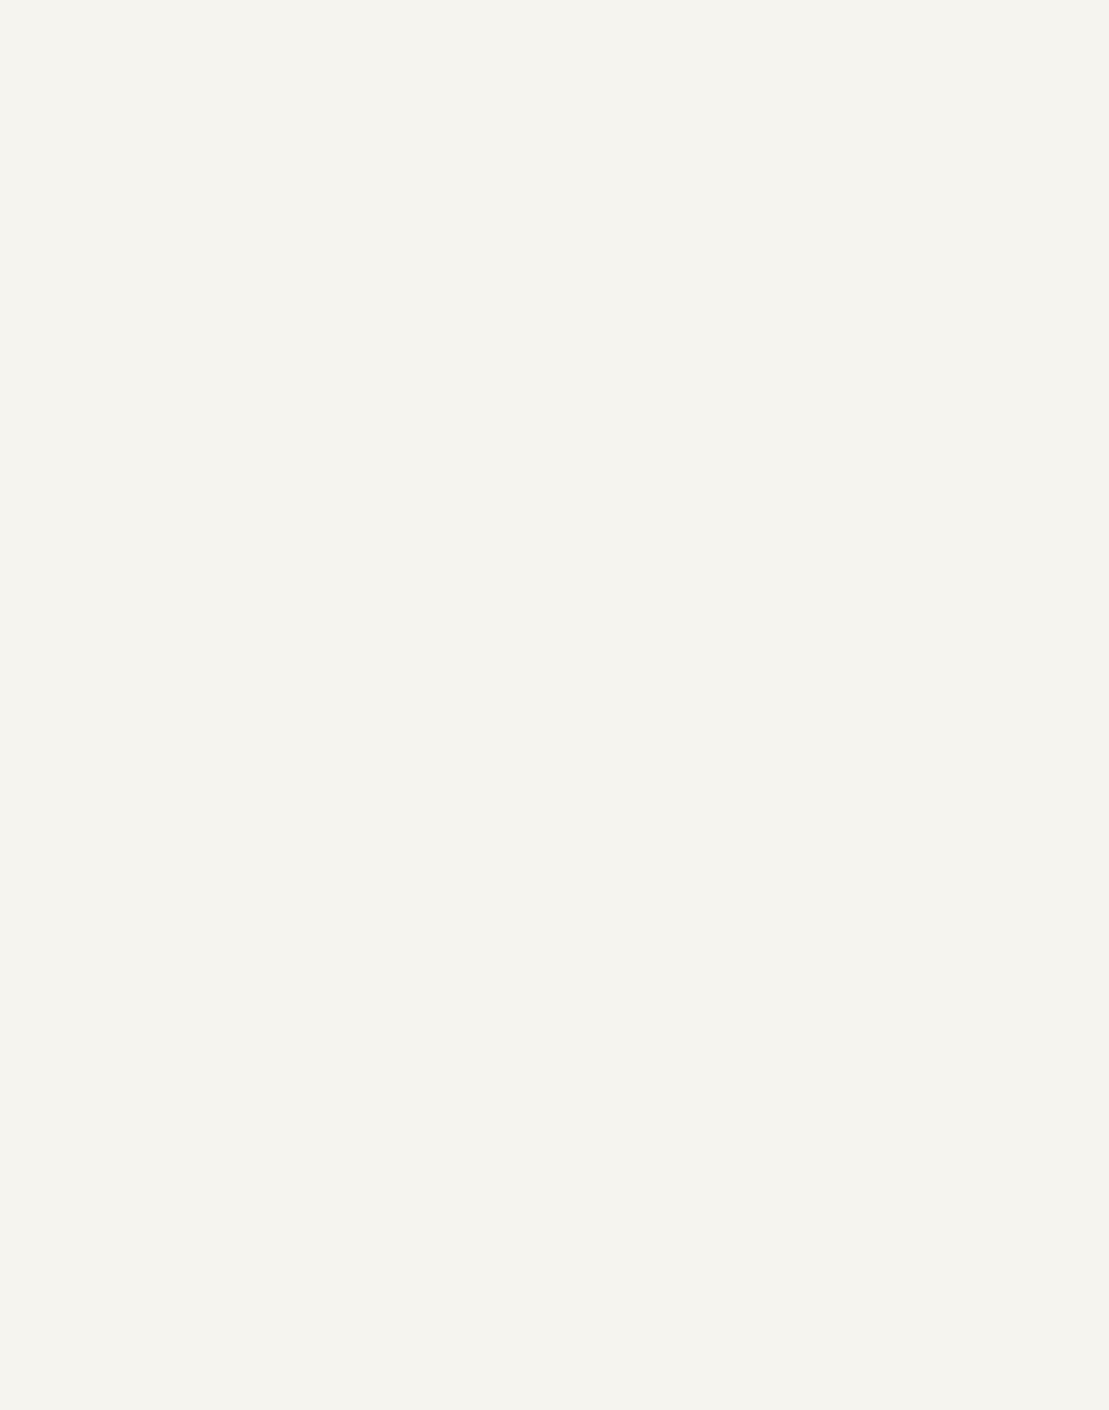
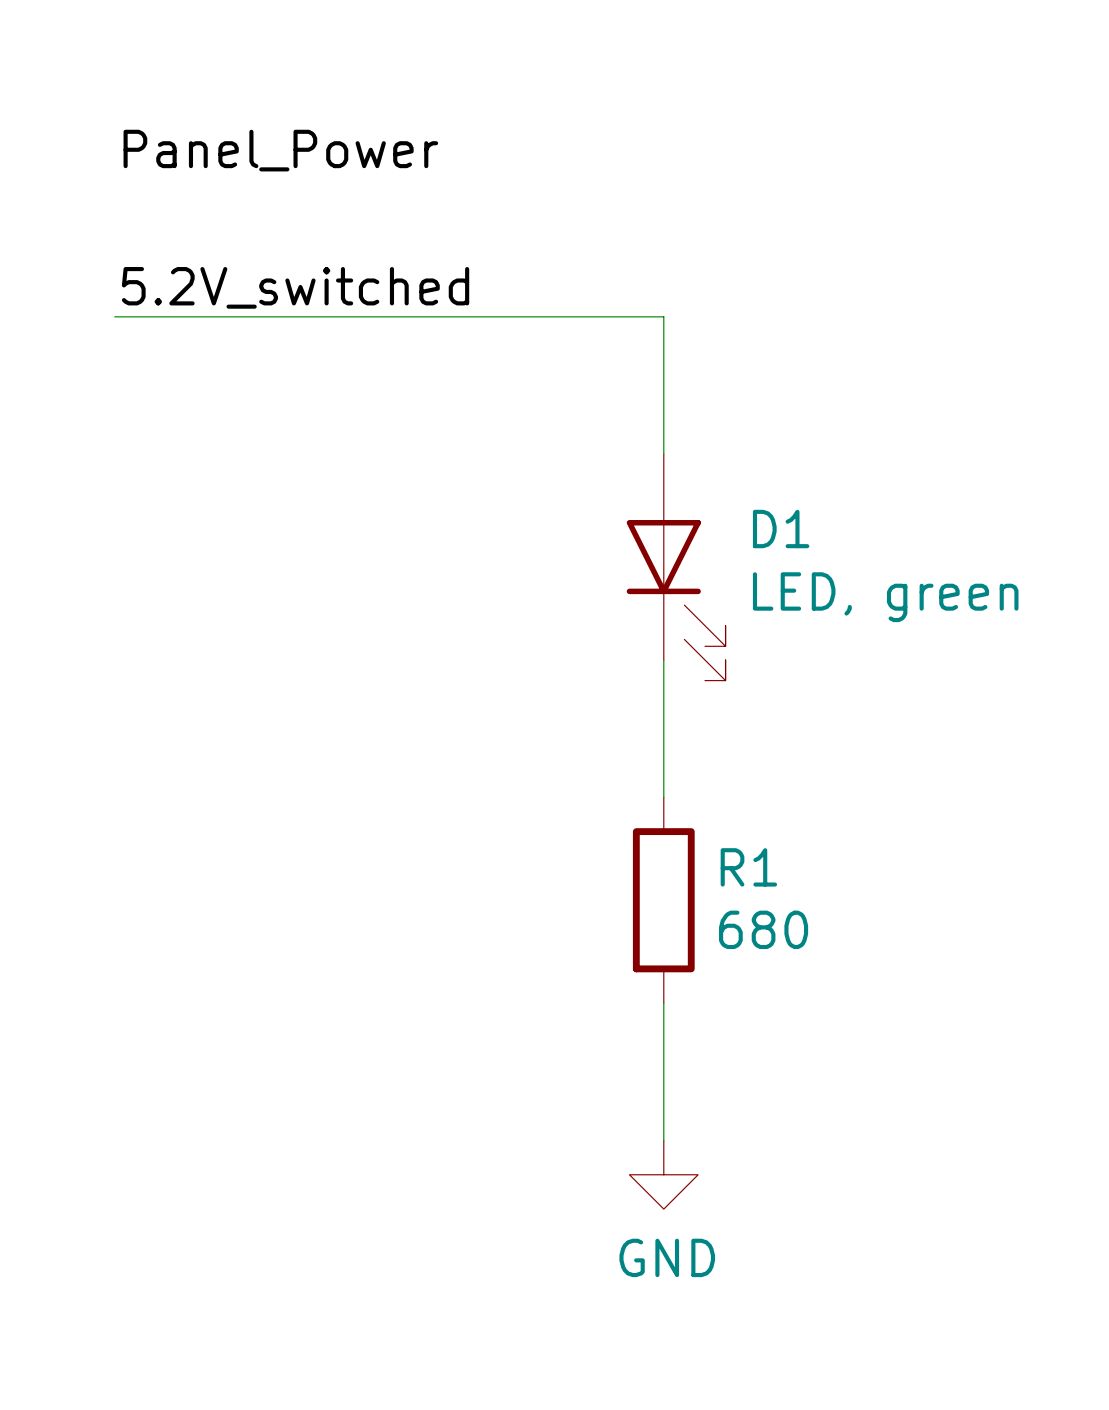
label: none -> Panel_Power (280, 150)
label: none -> 5.2V_switched (295, 287)
wire: none -> (114, 316) (663, 316) (663, 454)
D1: none -> LED, green (676, 567)
wire: none -> (663, 660) (663, 797)
R1: none -> 680 (663, 900)
wire: none -> (663, 1003) (663, 1140)
power symbol: none -> GND (663, 1174)

